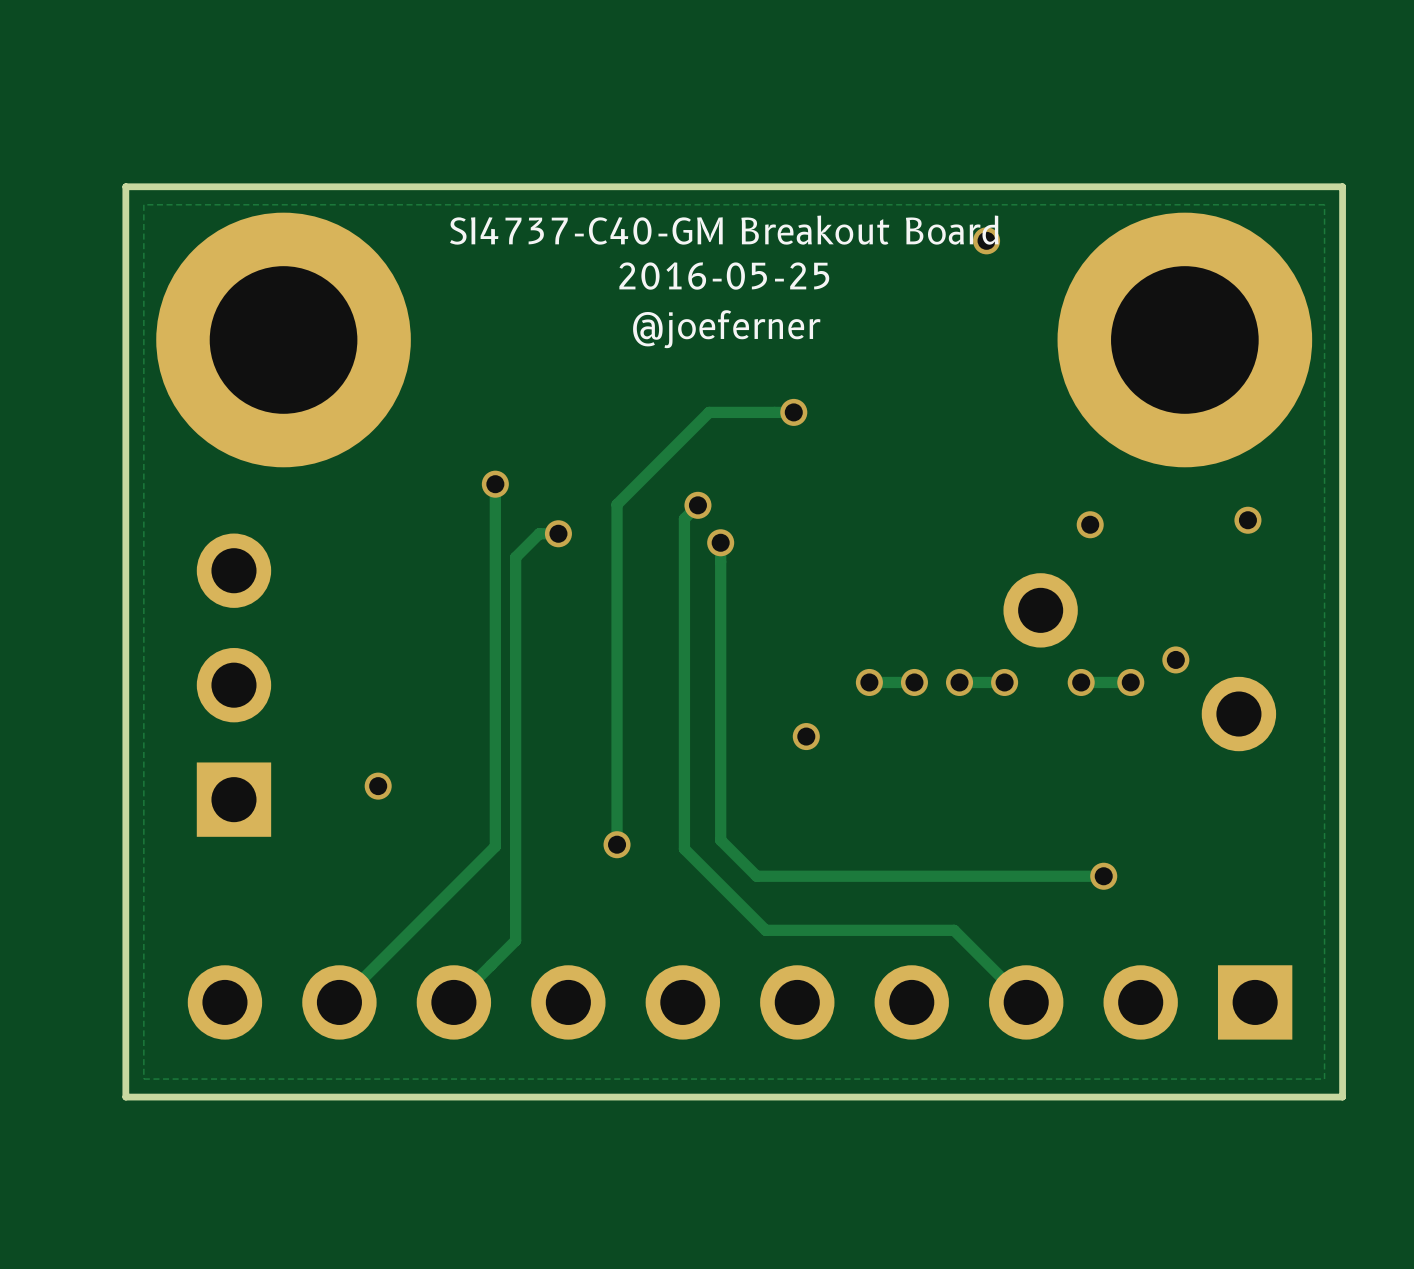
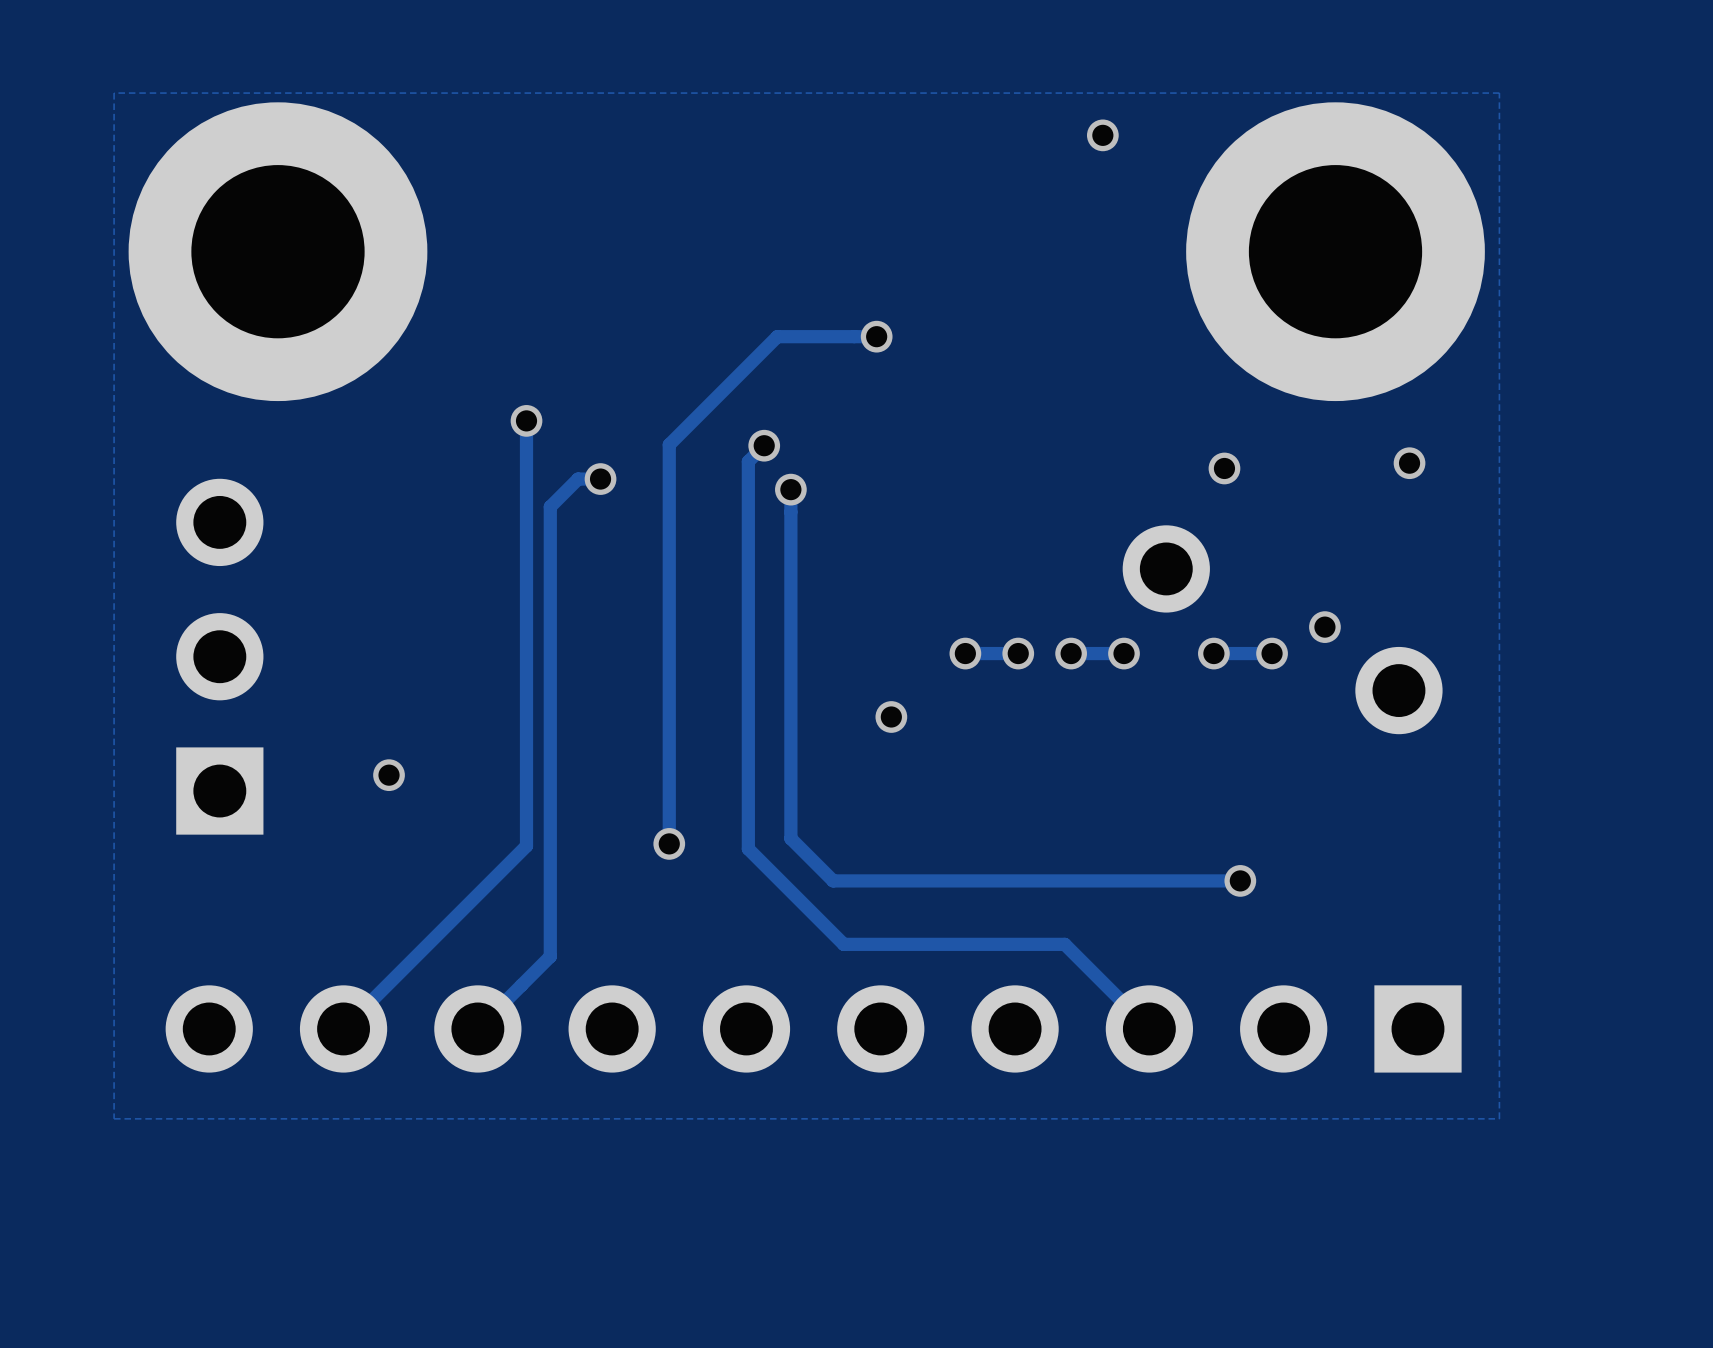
board edge: (1342, 186) (1342, 1097) (125, 1097) (125, 186) (1342, 186) -> none
text: SI4737-C40-GM Breakout Board (724, 230) -> none
text: 2016-05-25 (724, 276) -> none
text: @joeferner (726, 329) -> none

